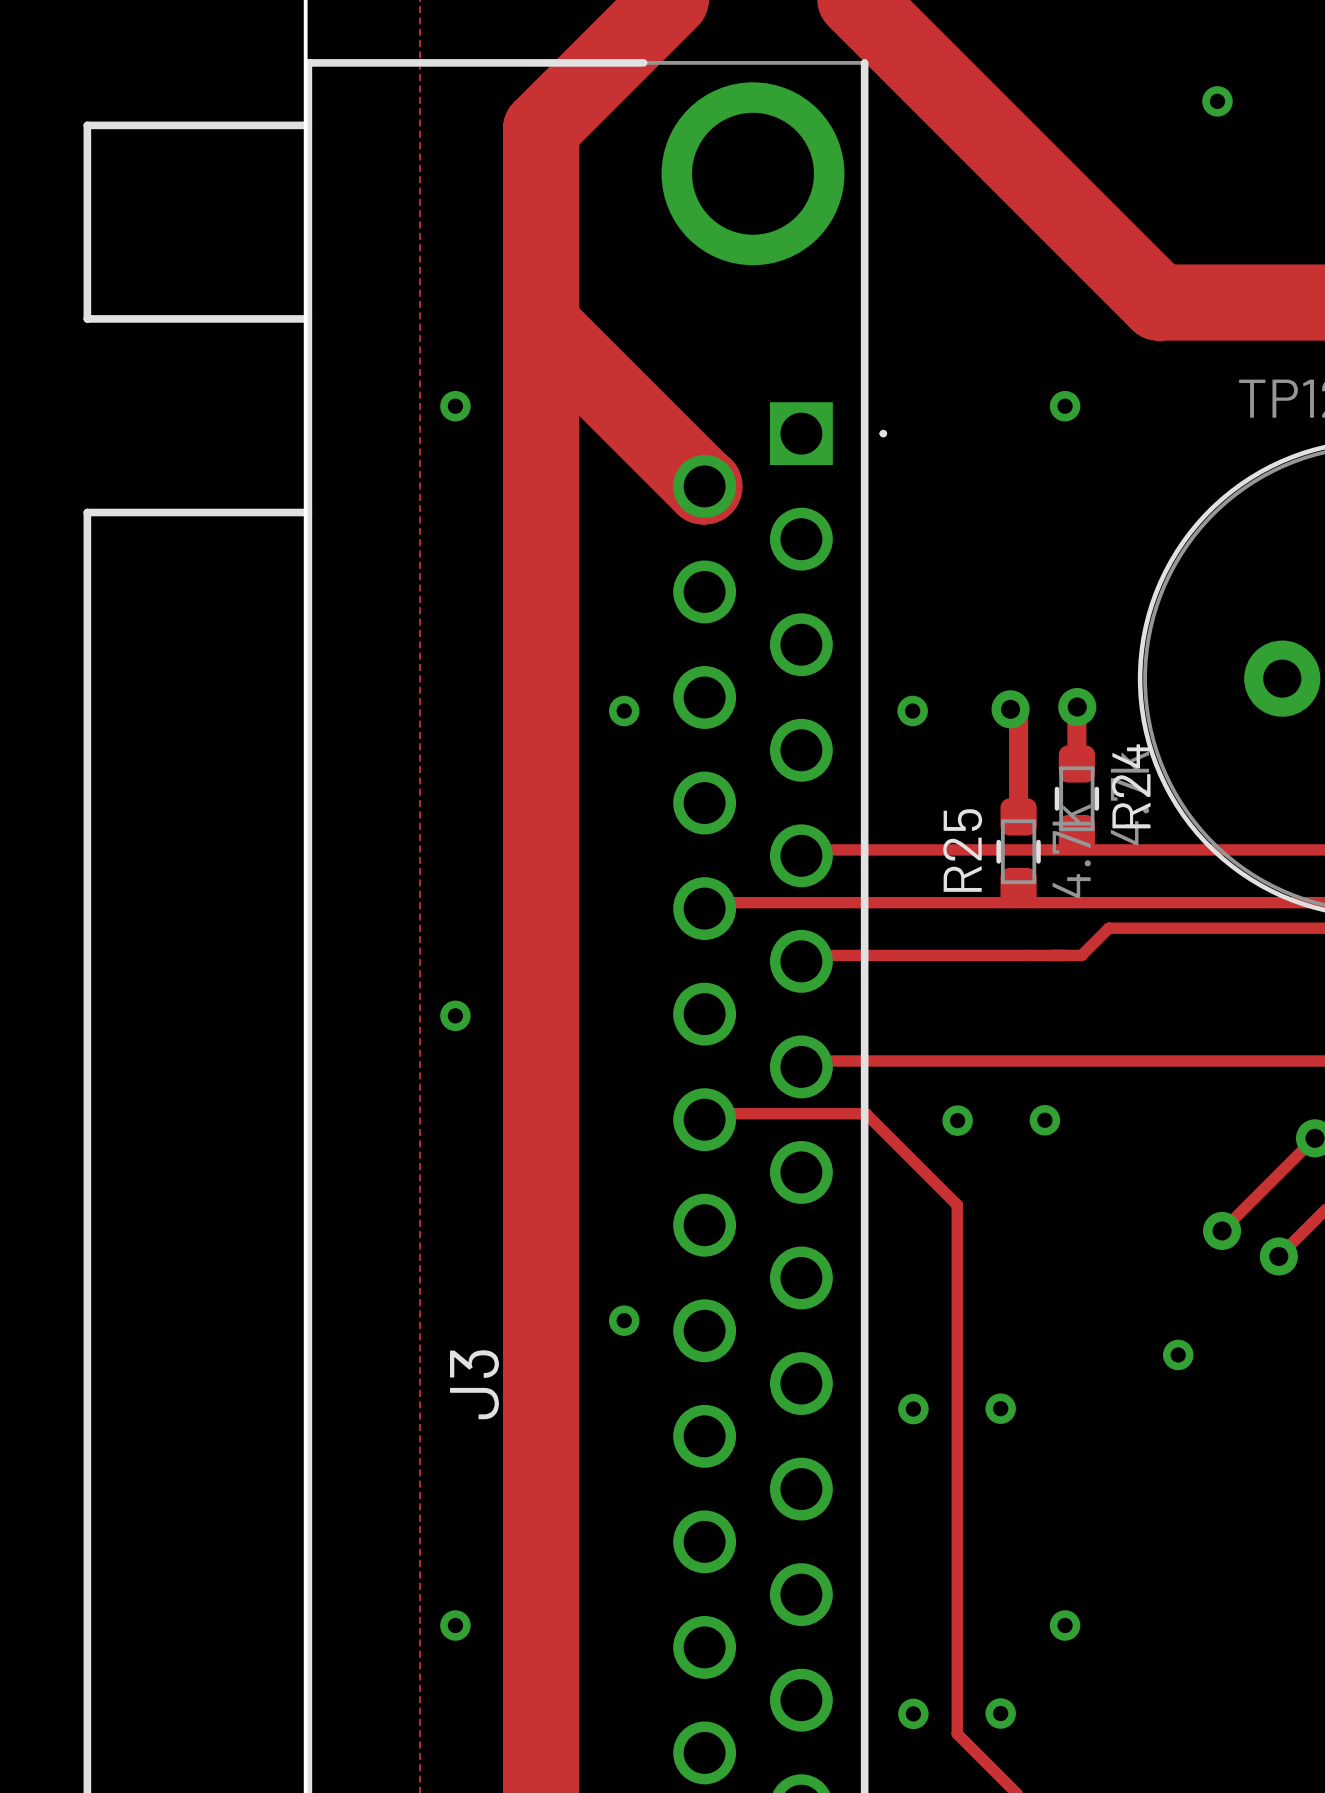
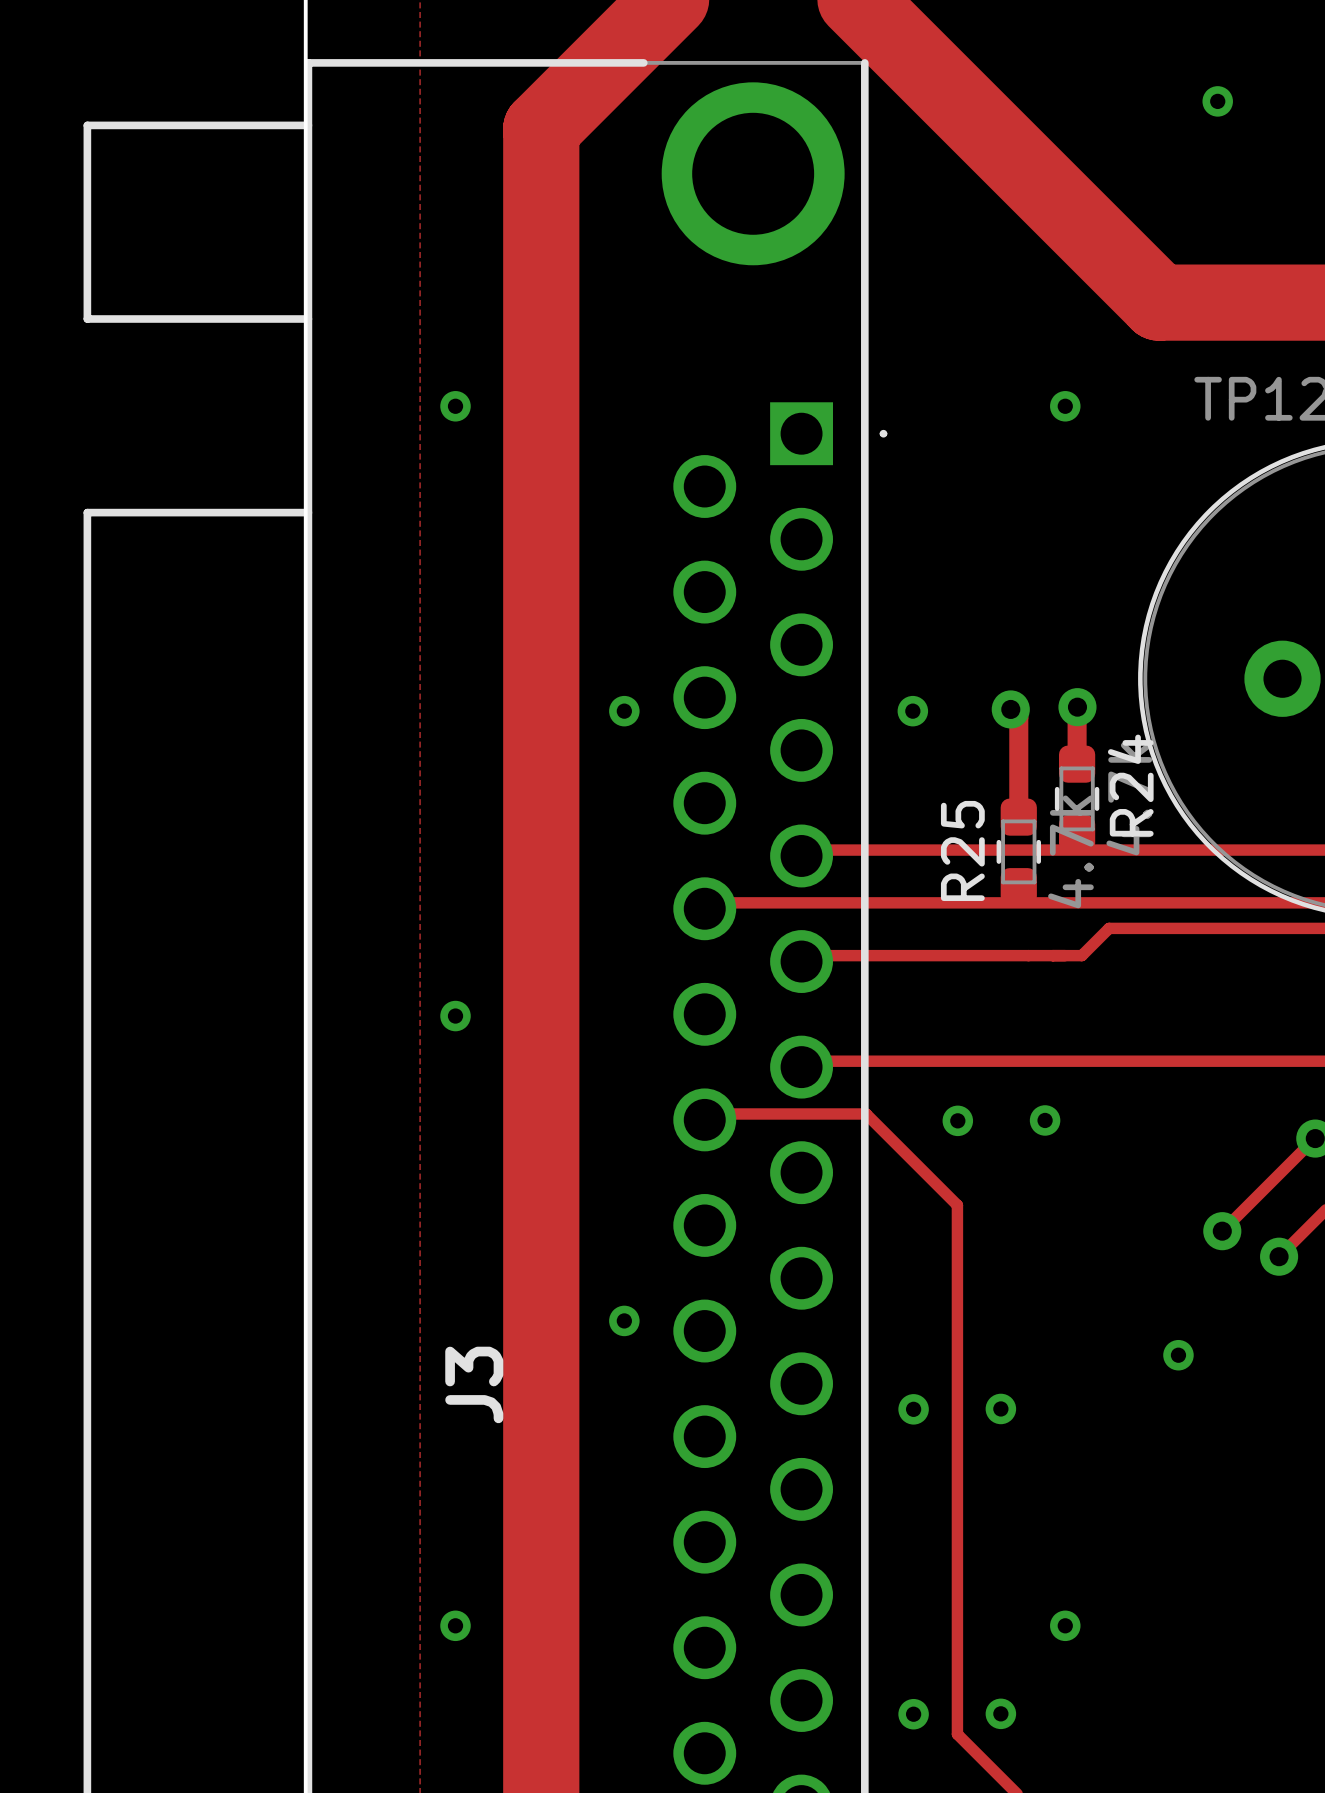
track: (542, 325) (704, 486) -> none

